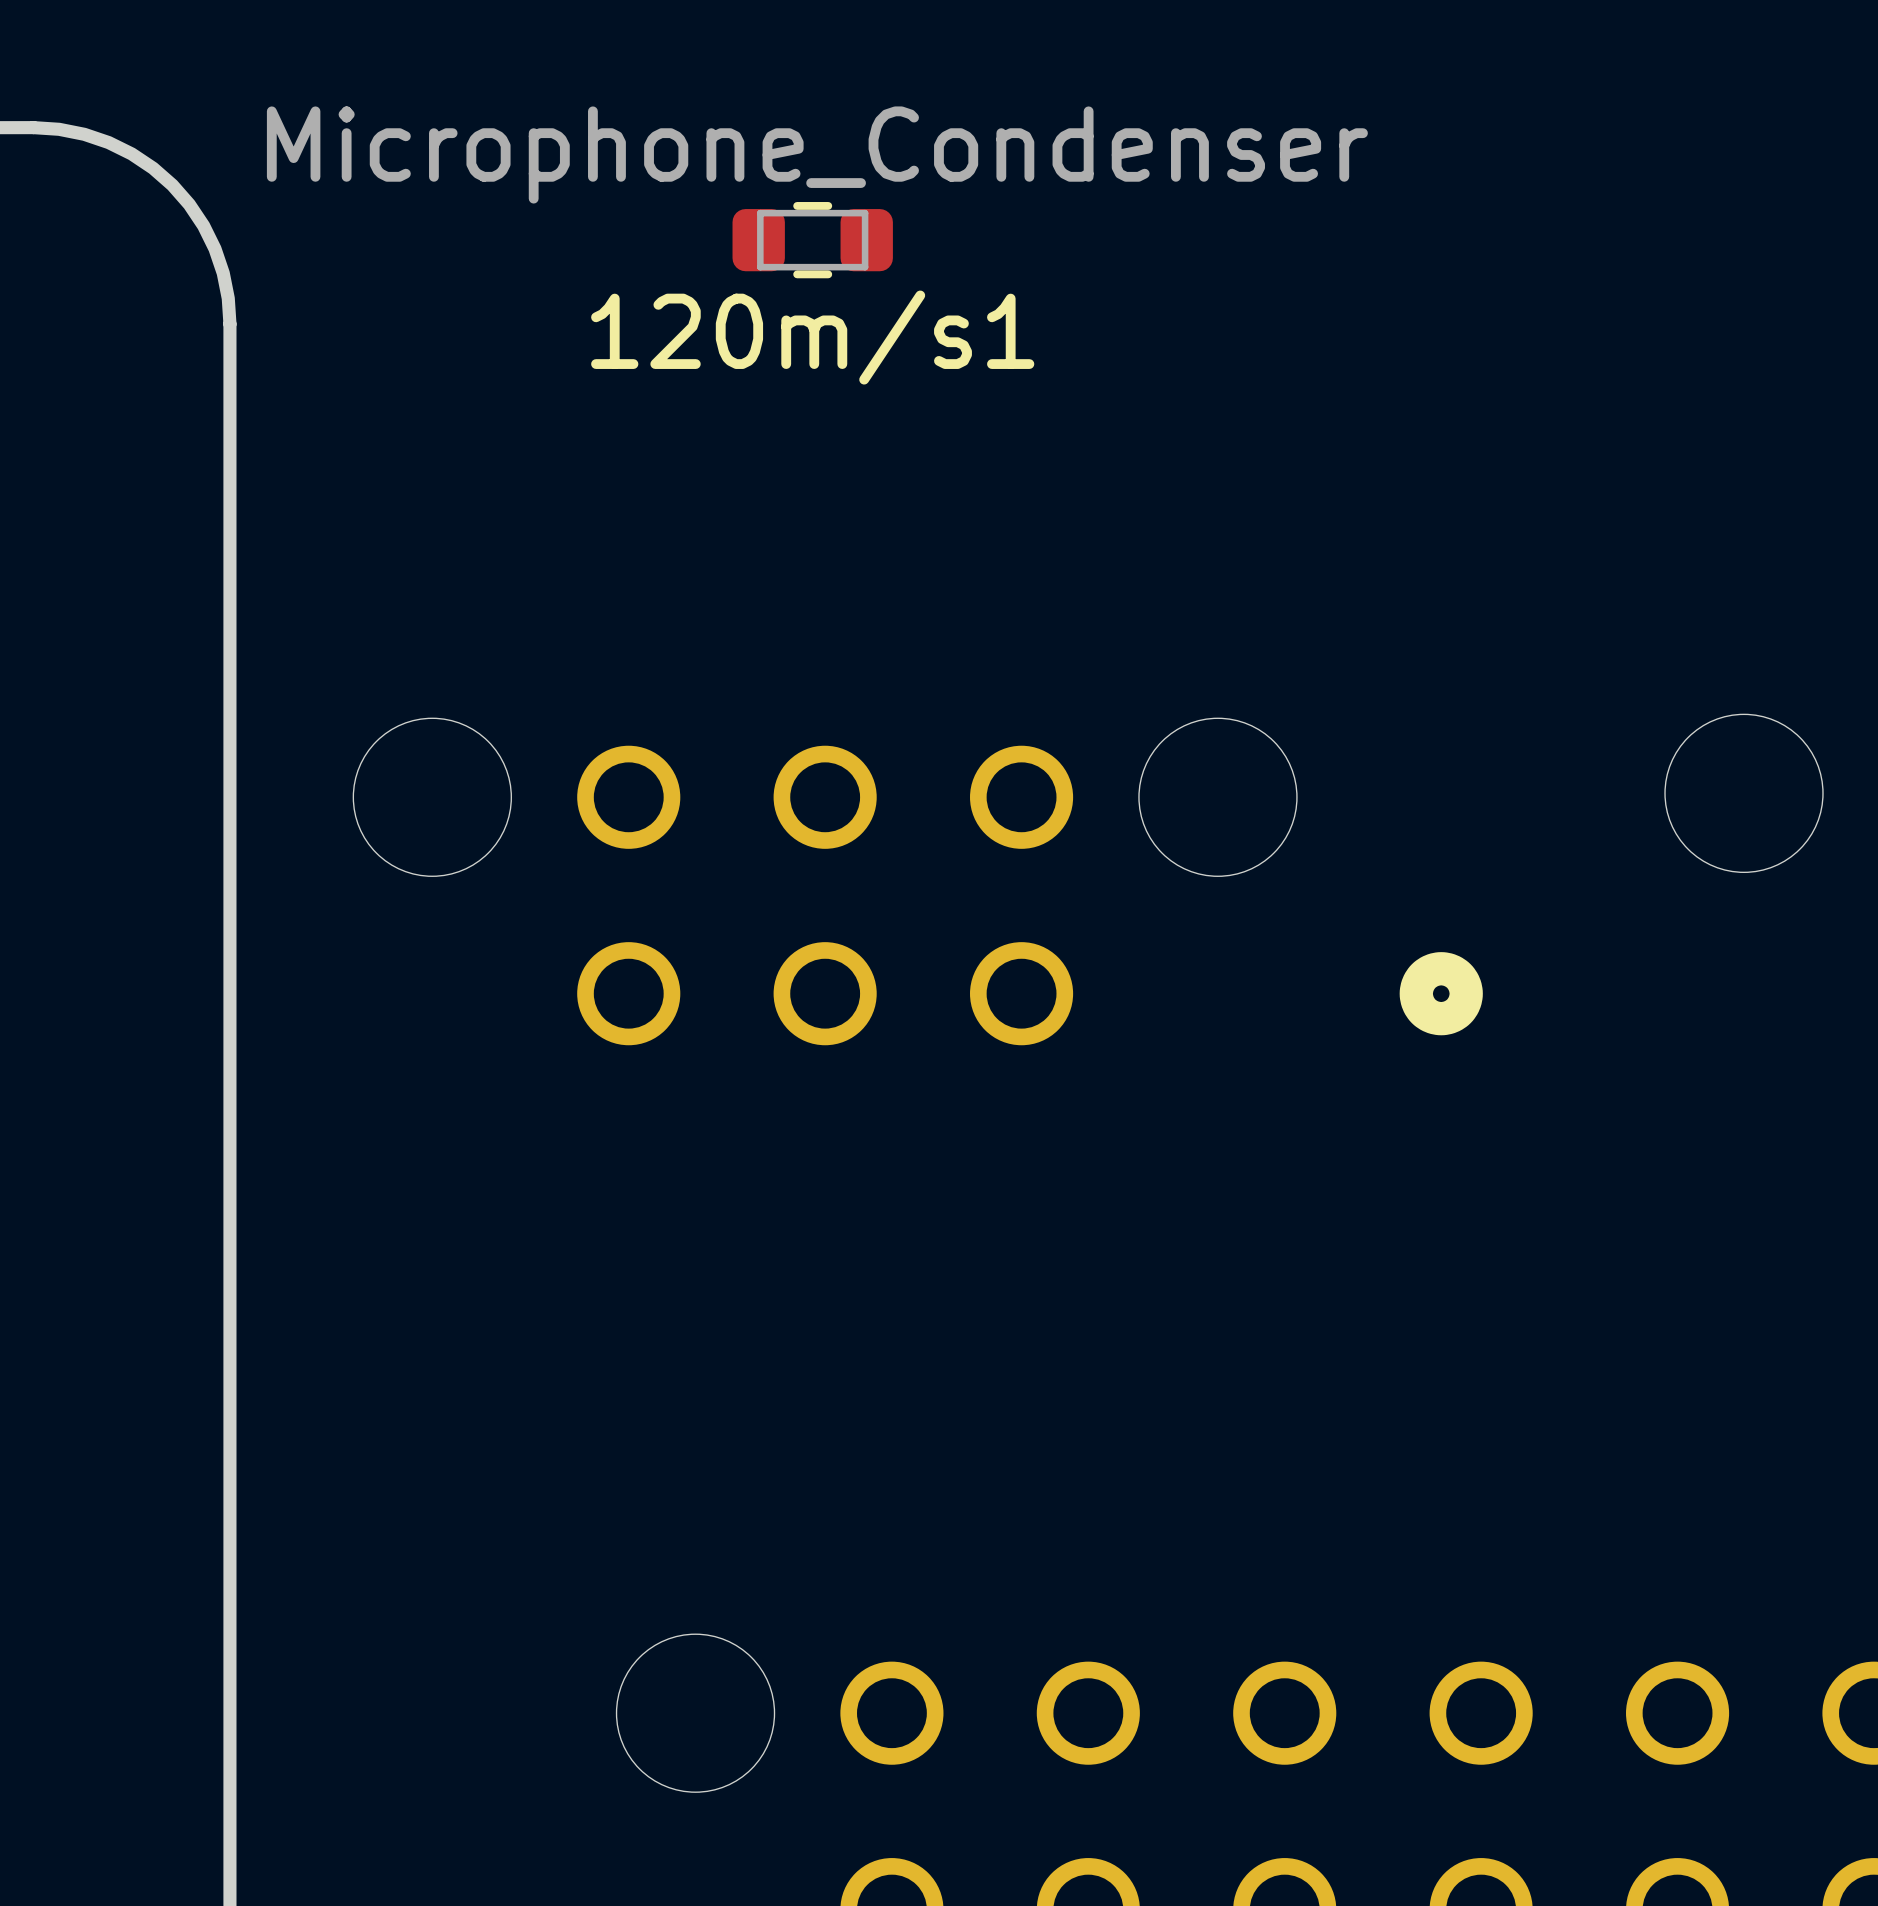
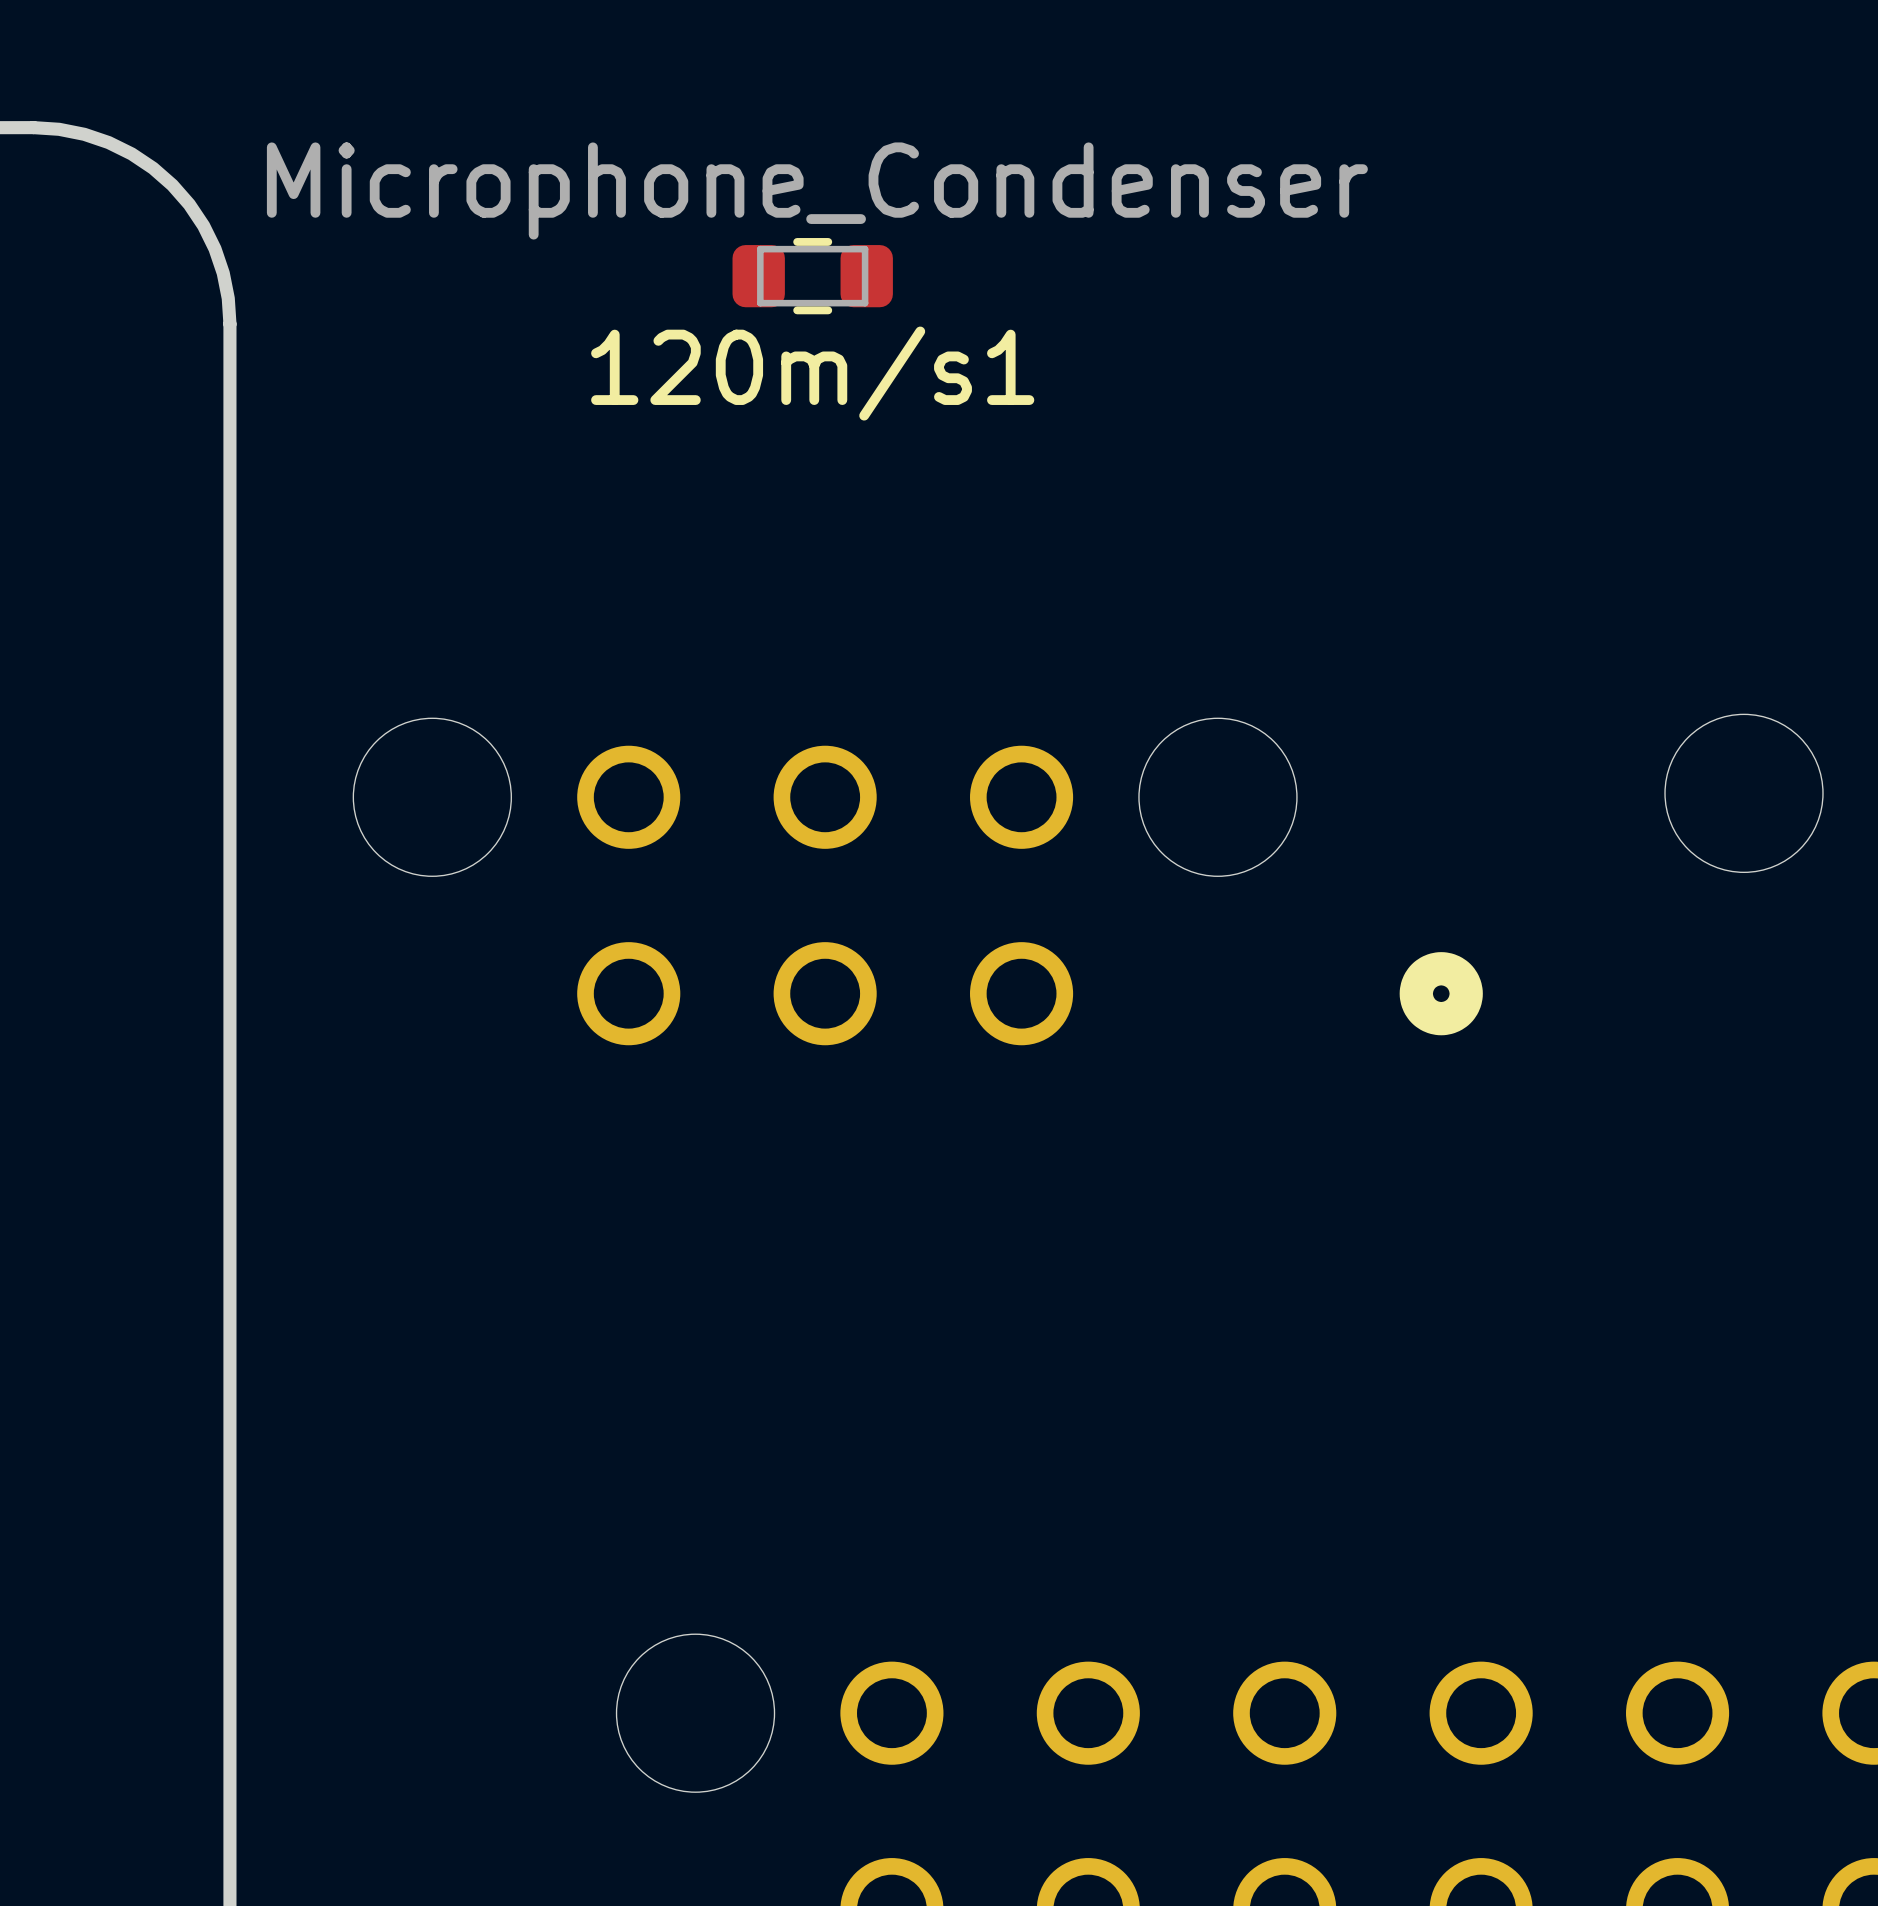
120m/s1 position: (812, 240) -> (812, 276)

